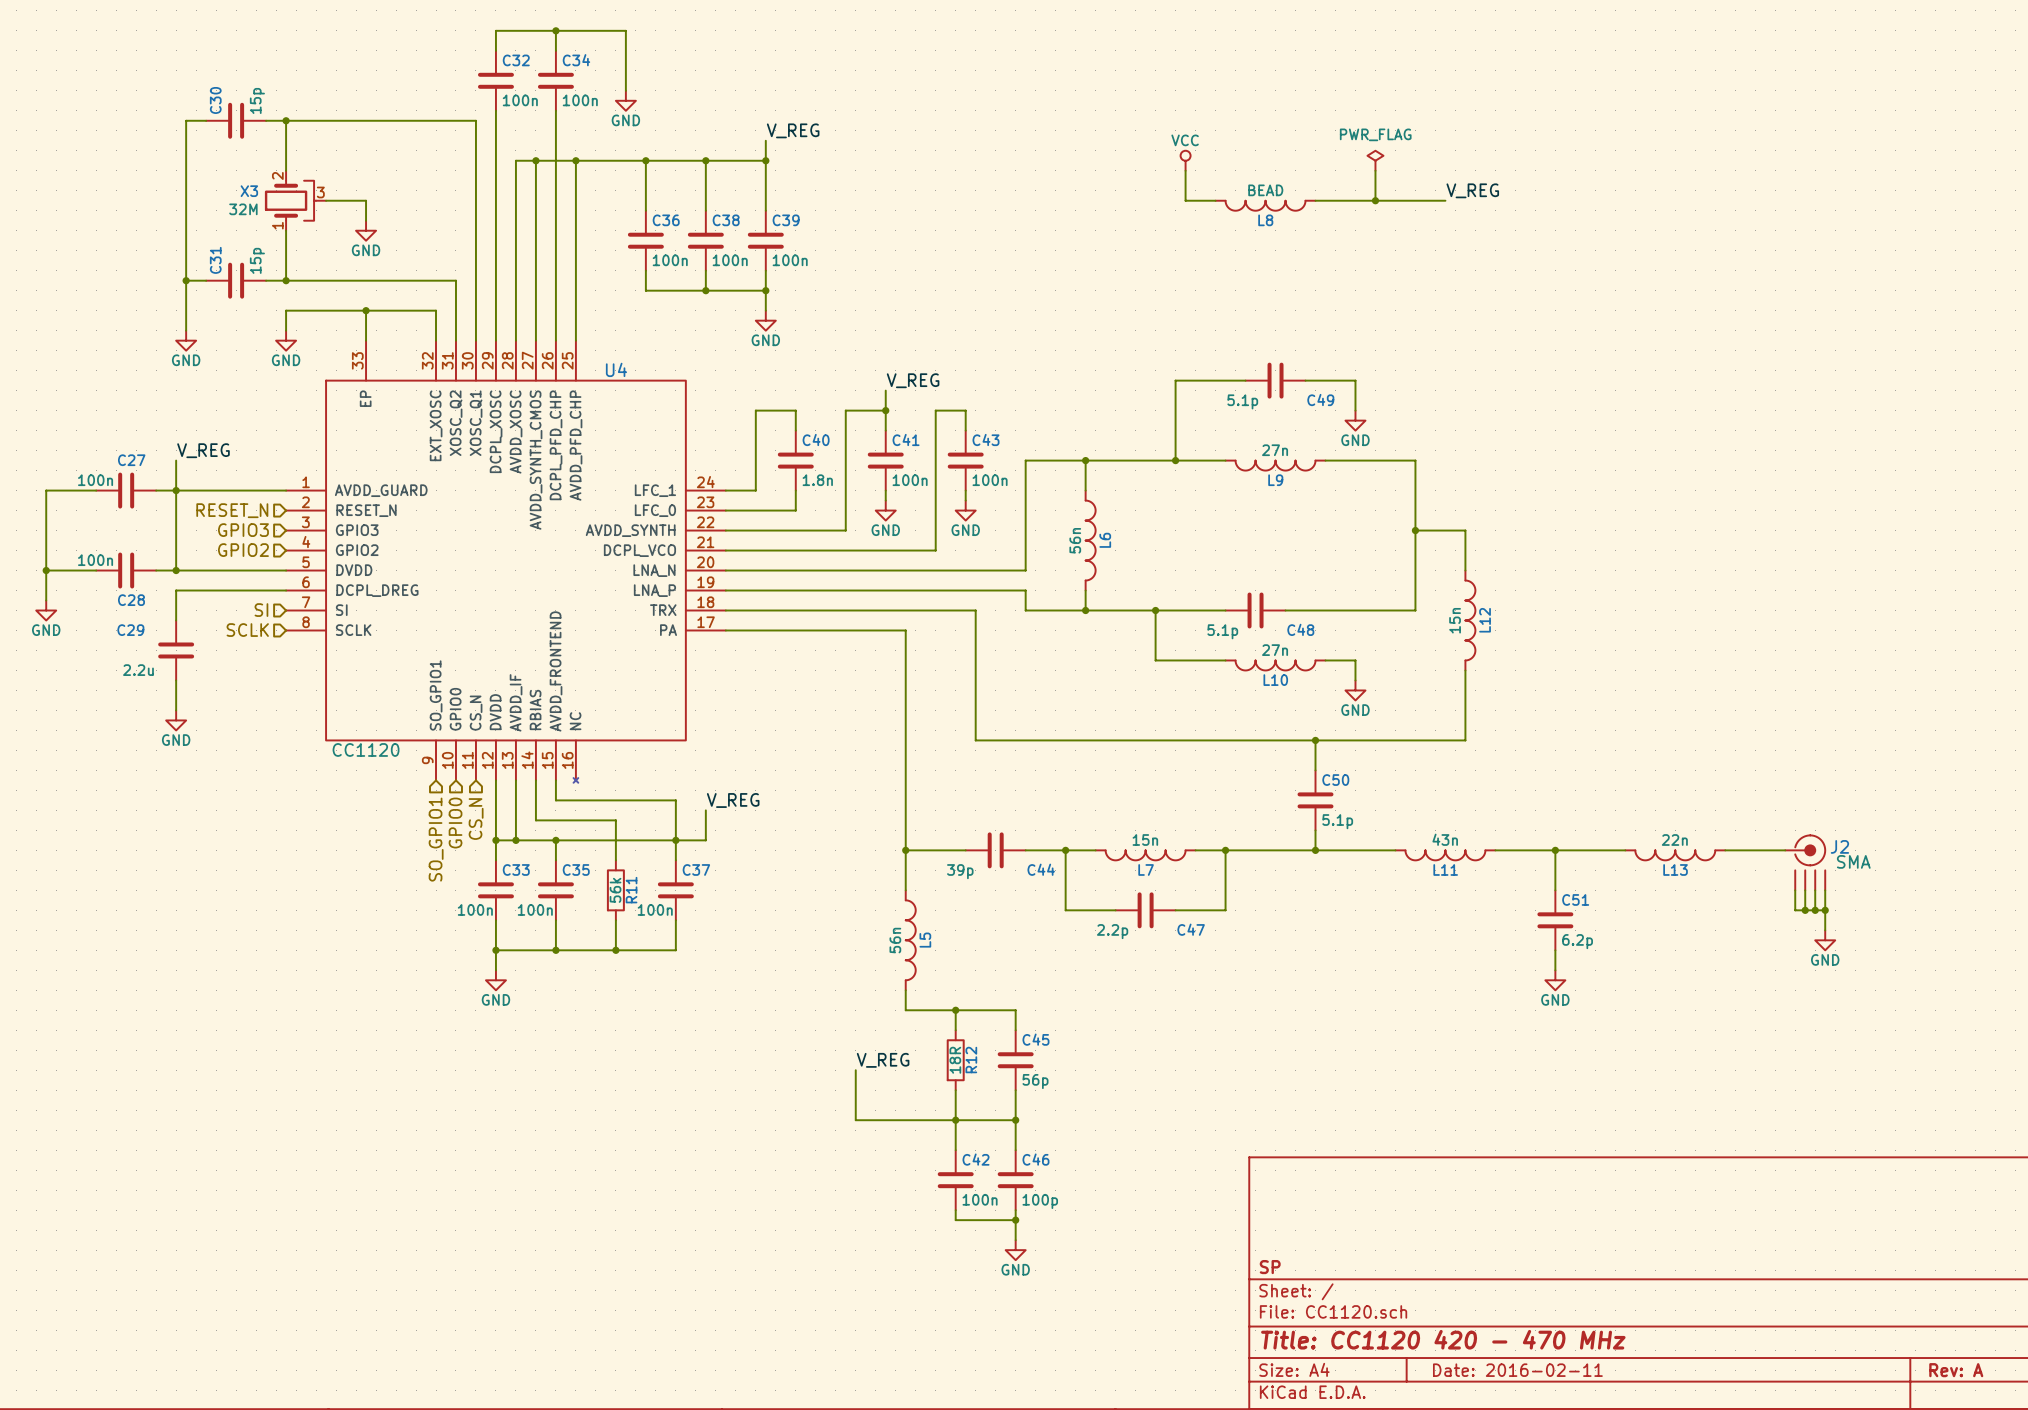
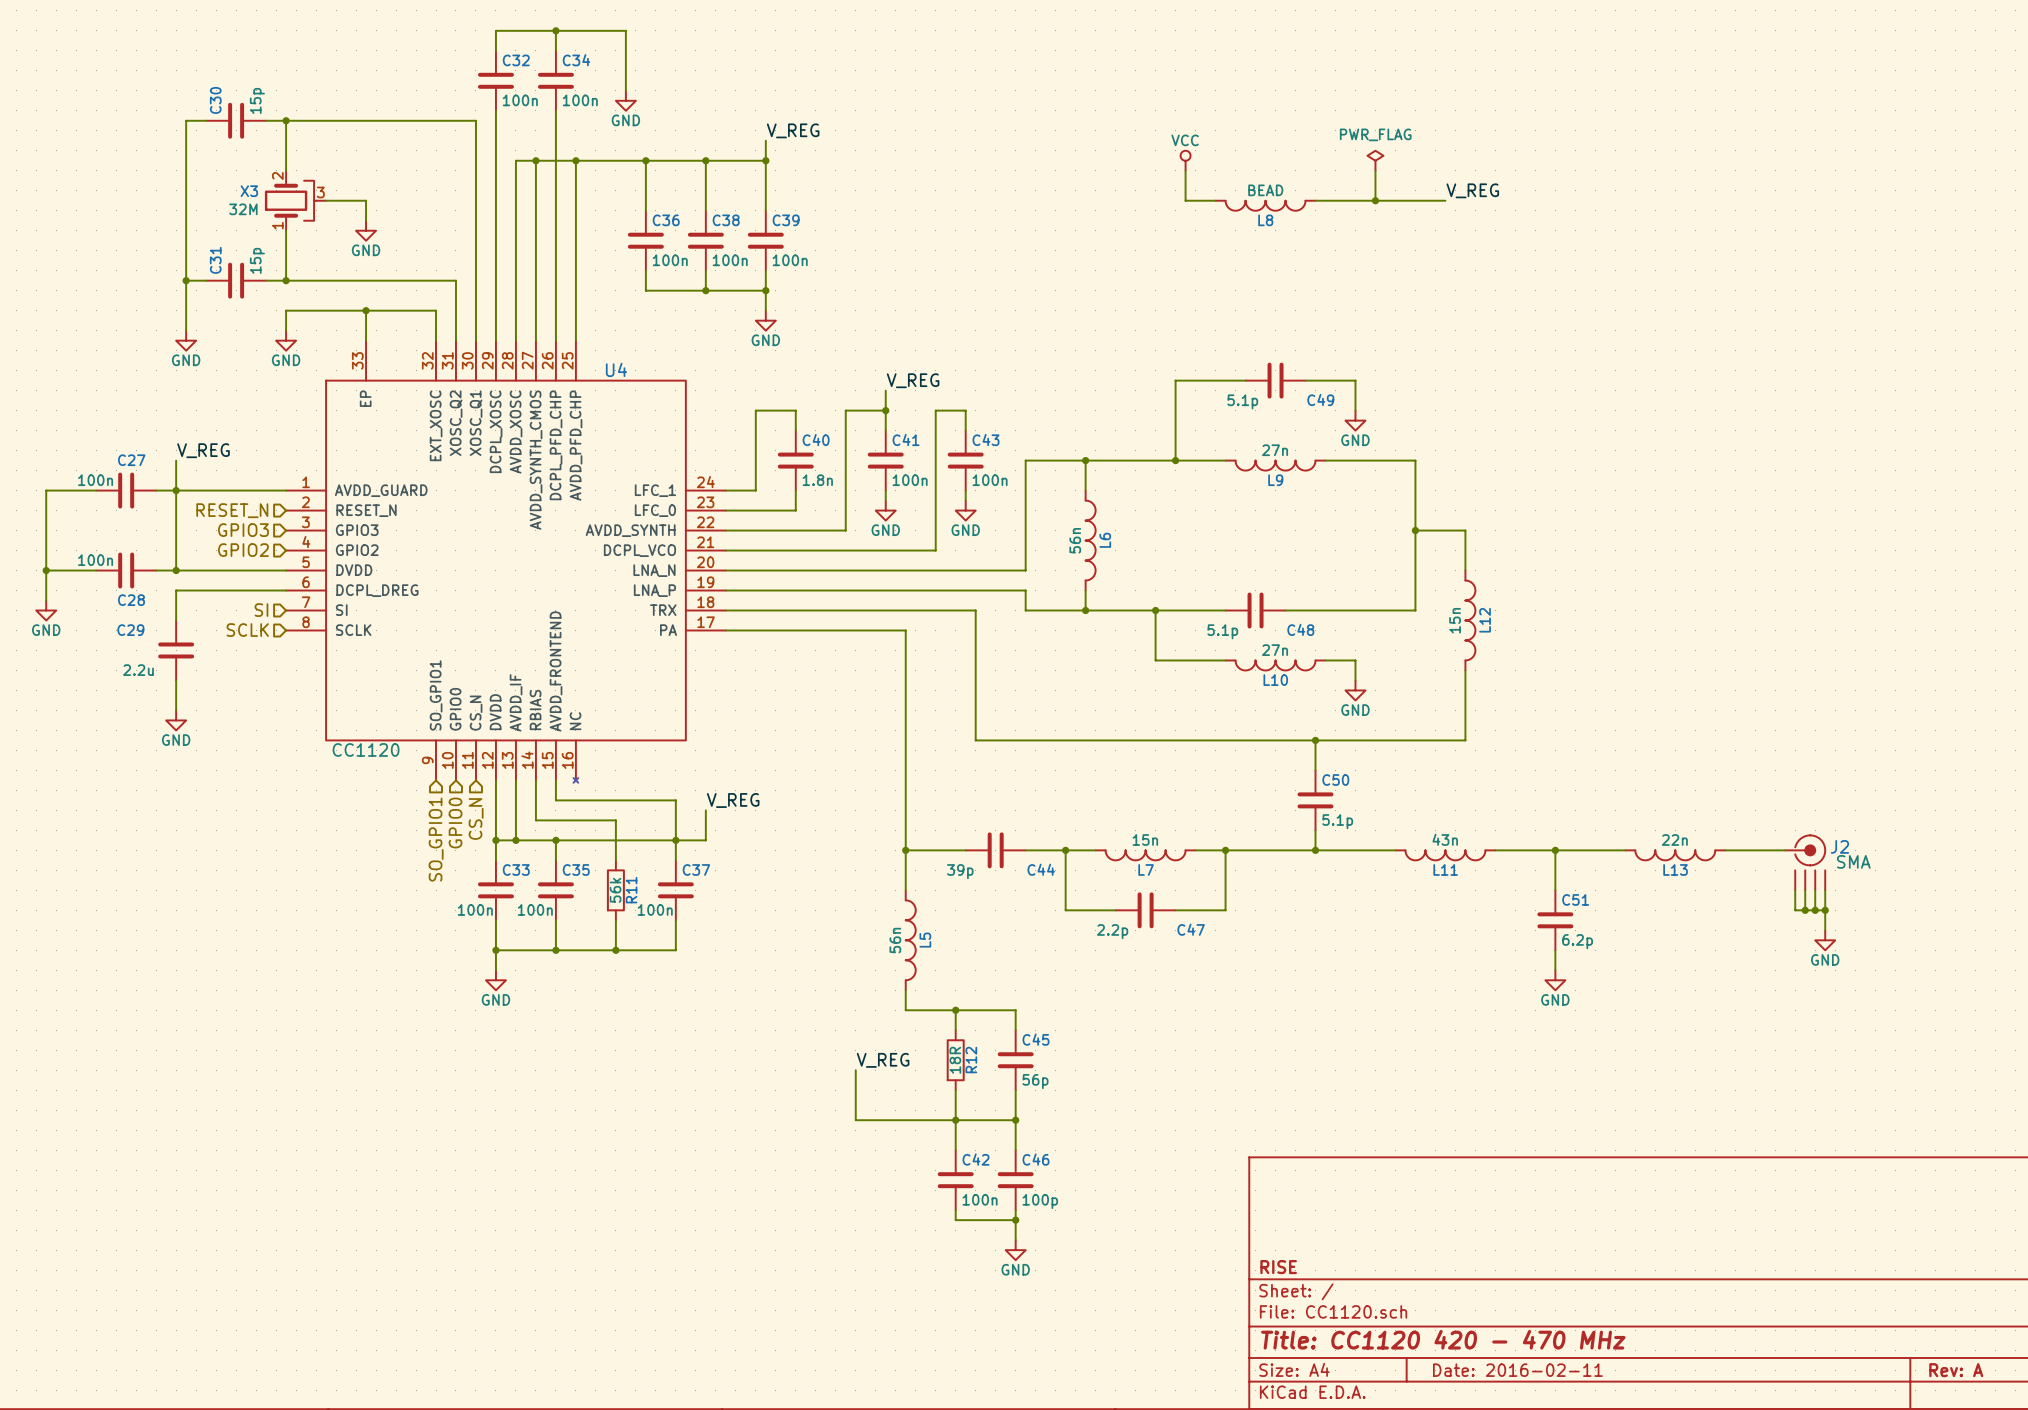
title block: SP (1270, 1267) -> RISE (1278, 1267)

